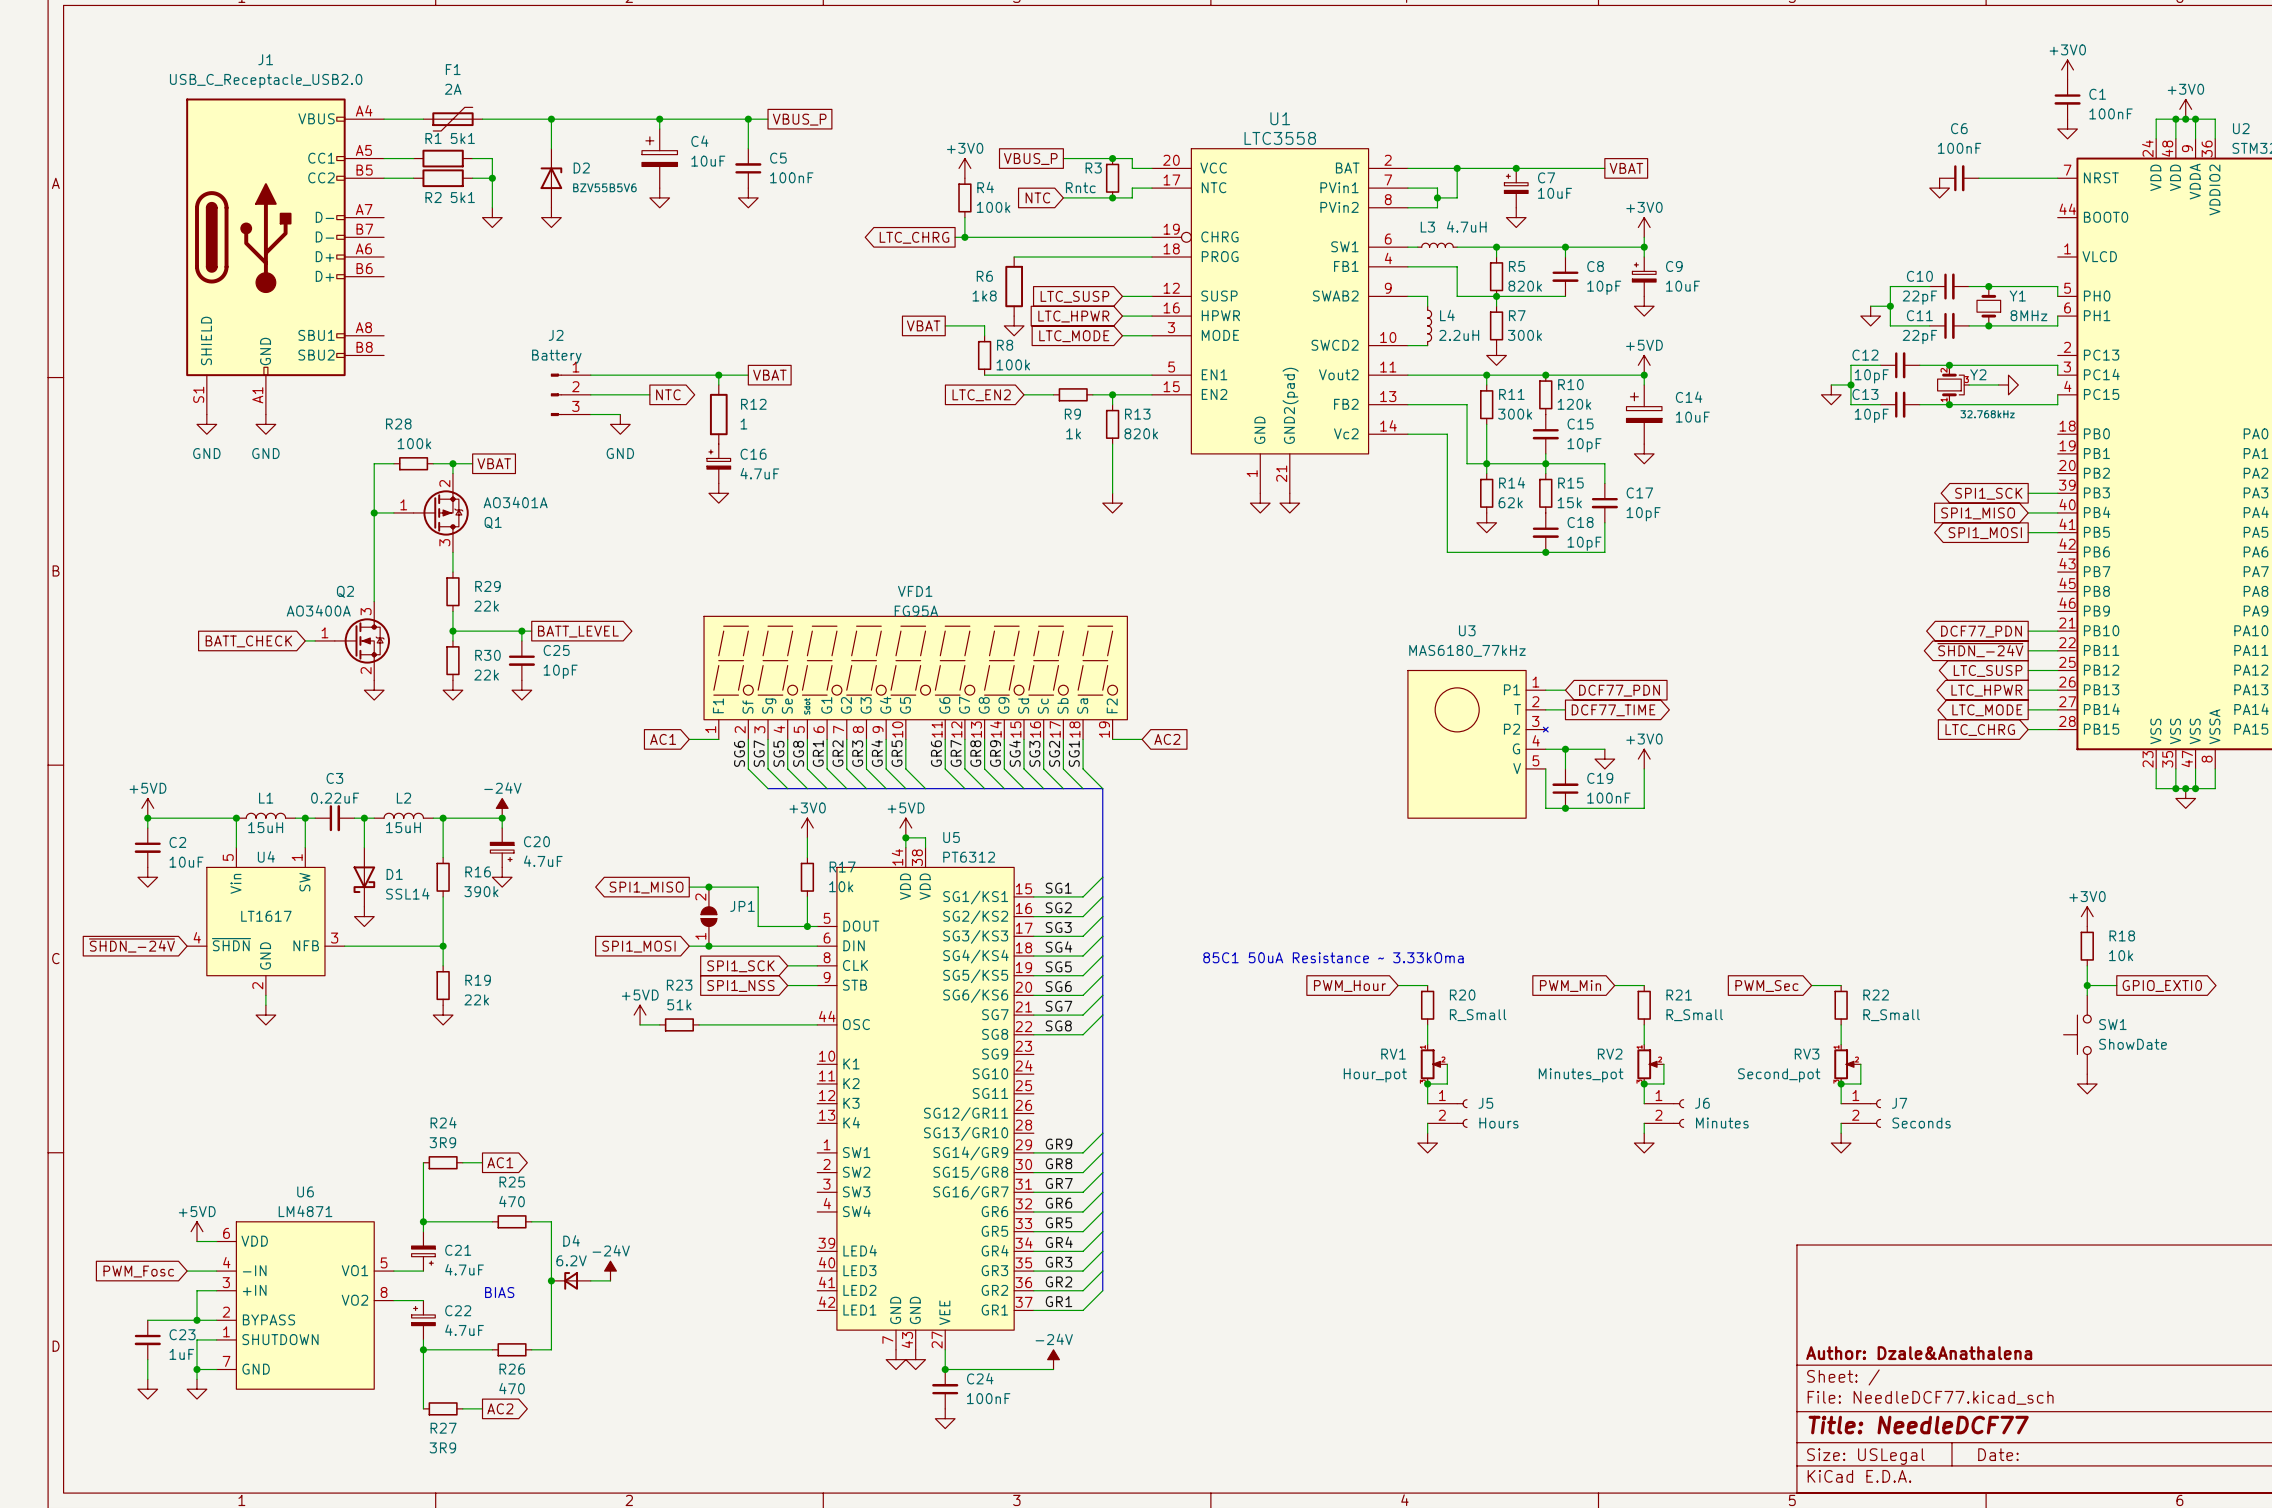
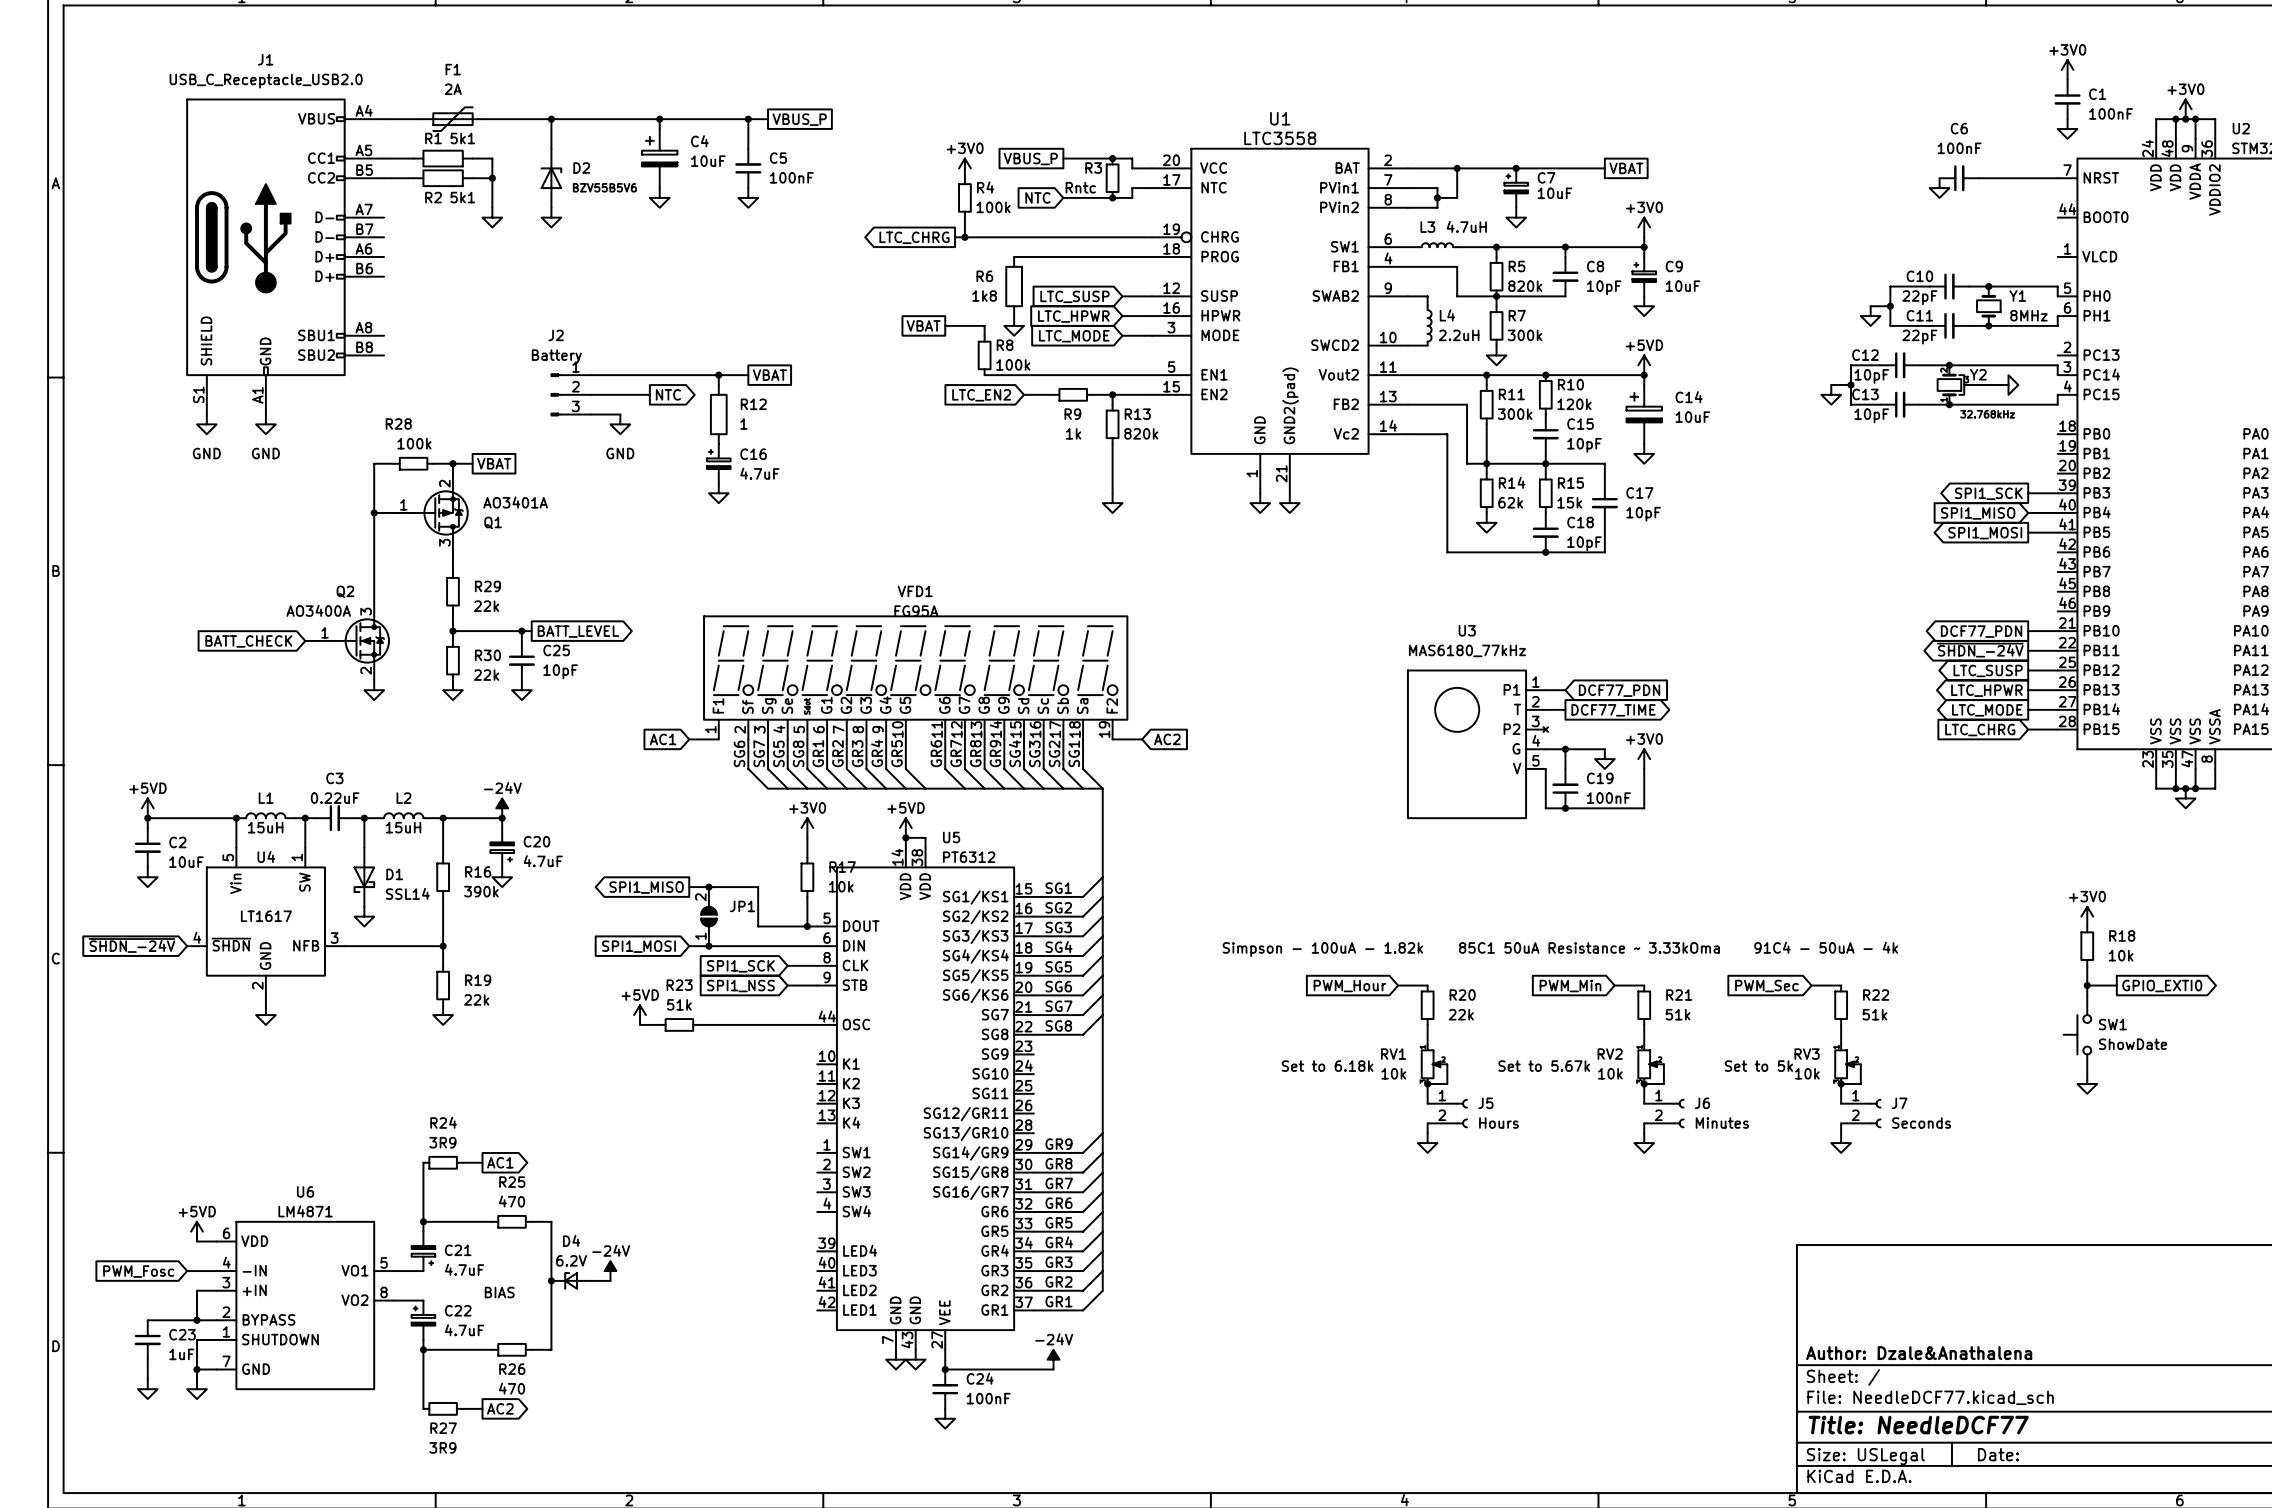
text: none -> 85C1 50uA Resistance ~ 3.33kOma (1589, 947)
text: none -> 91C4 - 50uA - 4k (1826, 947)
text: none -> Simpson - 100uA - 1.82k (1322, 949)
text: 85C1 50uA Resistance ~ 3.33kOma (1333, 957) -> none
R20 value: R_Small (1478, 1015) -> 22k (1461, 1014)
R21 value: R_Small (1694, 1015) -> 51k (1678, 1014)
R22 value: R_Small (1891, 1015) -> 51k (1874, 1014)
text: none -> Set to 6.18k (1327, 1066)
text: none -> Set to 5.67k (1544, 1066)
text: none -> Set to 5k (1758, 1066)
RV1 value: Hour_pot (1375, 1075) -> 10k (1393, 1073)
RV2 value: Minutes_pot (1581, 1075) -> 10k (1610, 1073)
RV3 value: Second_pot (1779, 1075) -> 10k (1807, 1073)

